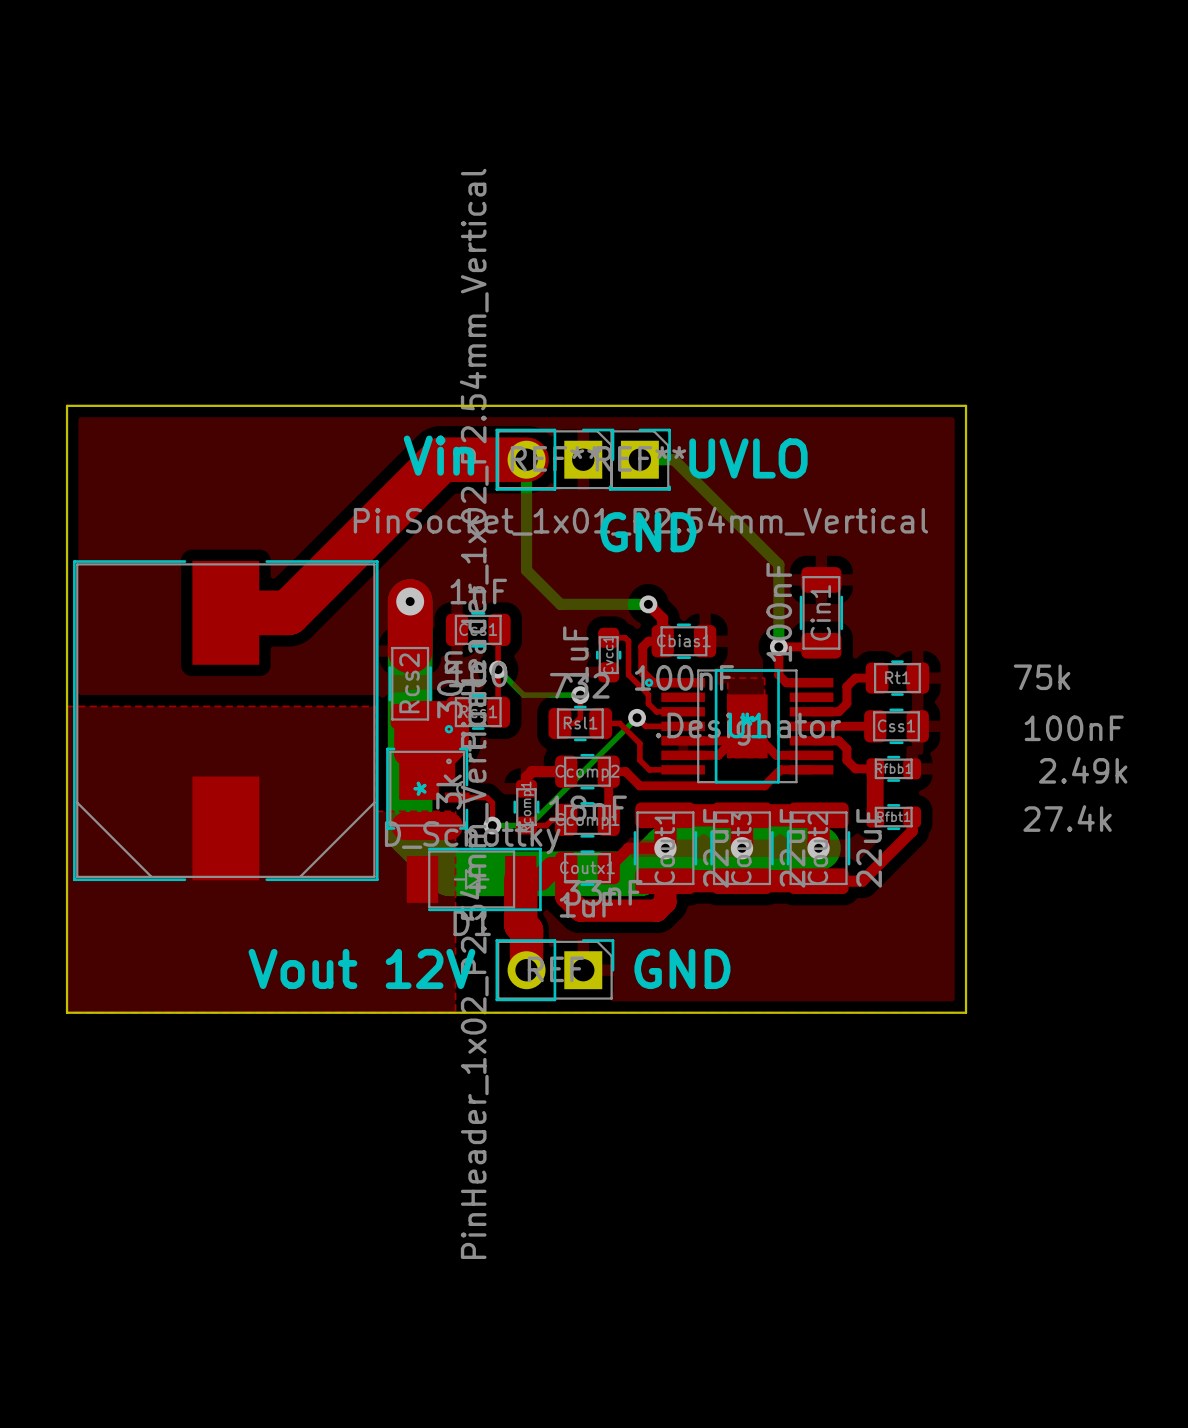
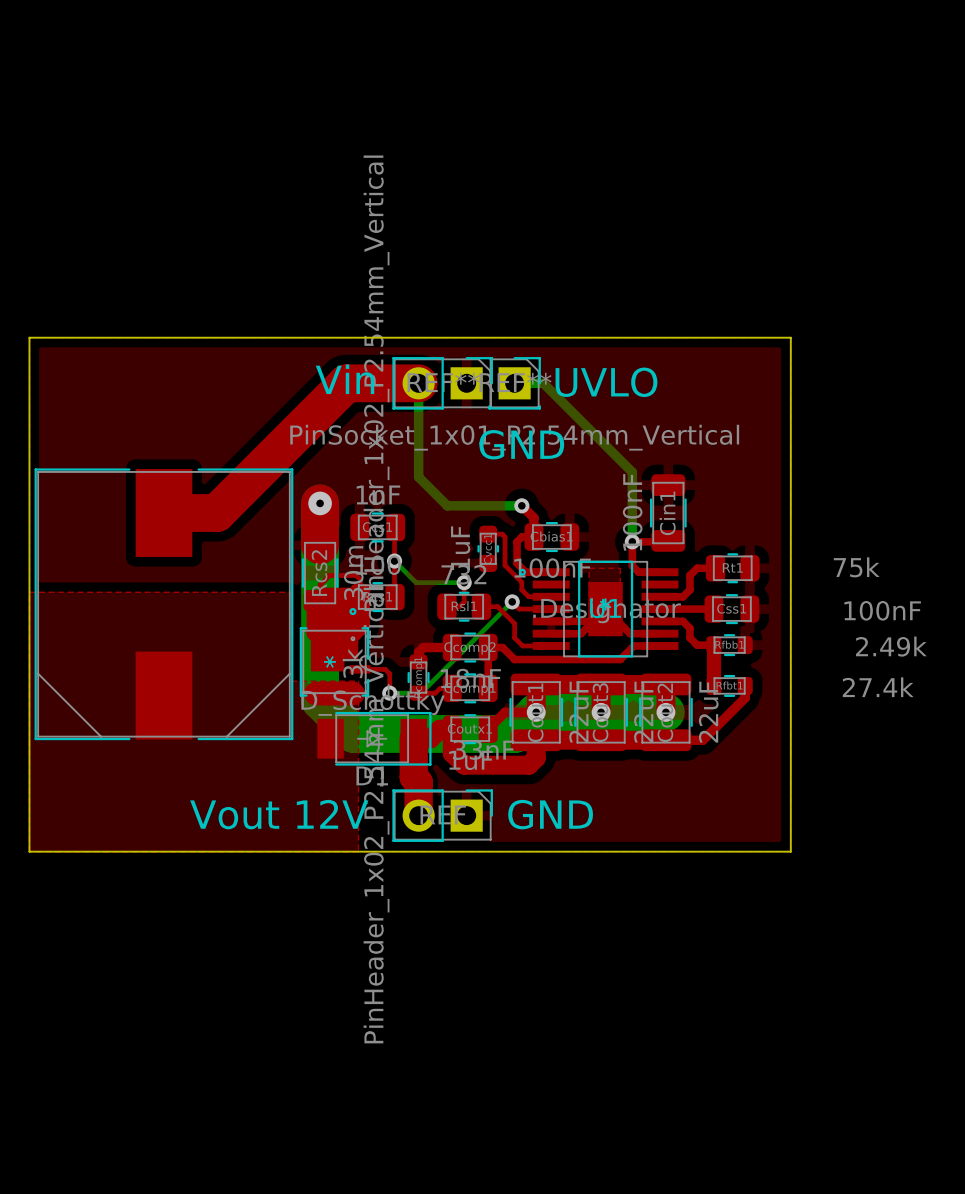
top track: none -> (360, 597) (360, 579) (356, 575) (329, 575) (320, 585) (320, 600)

